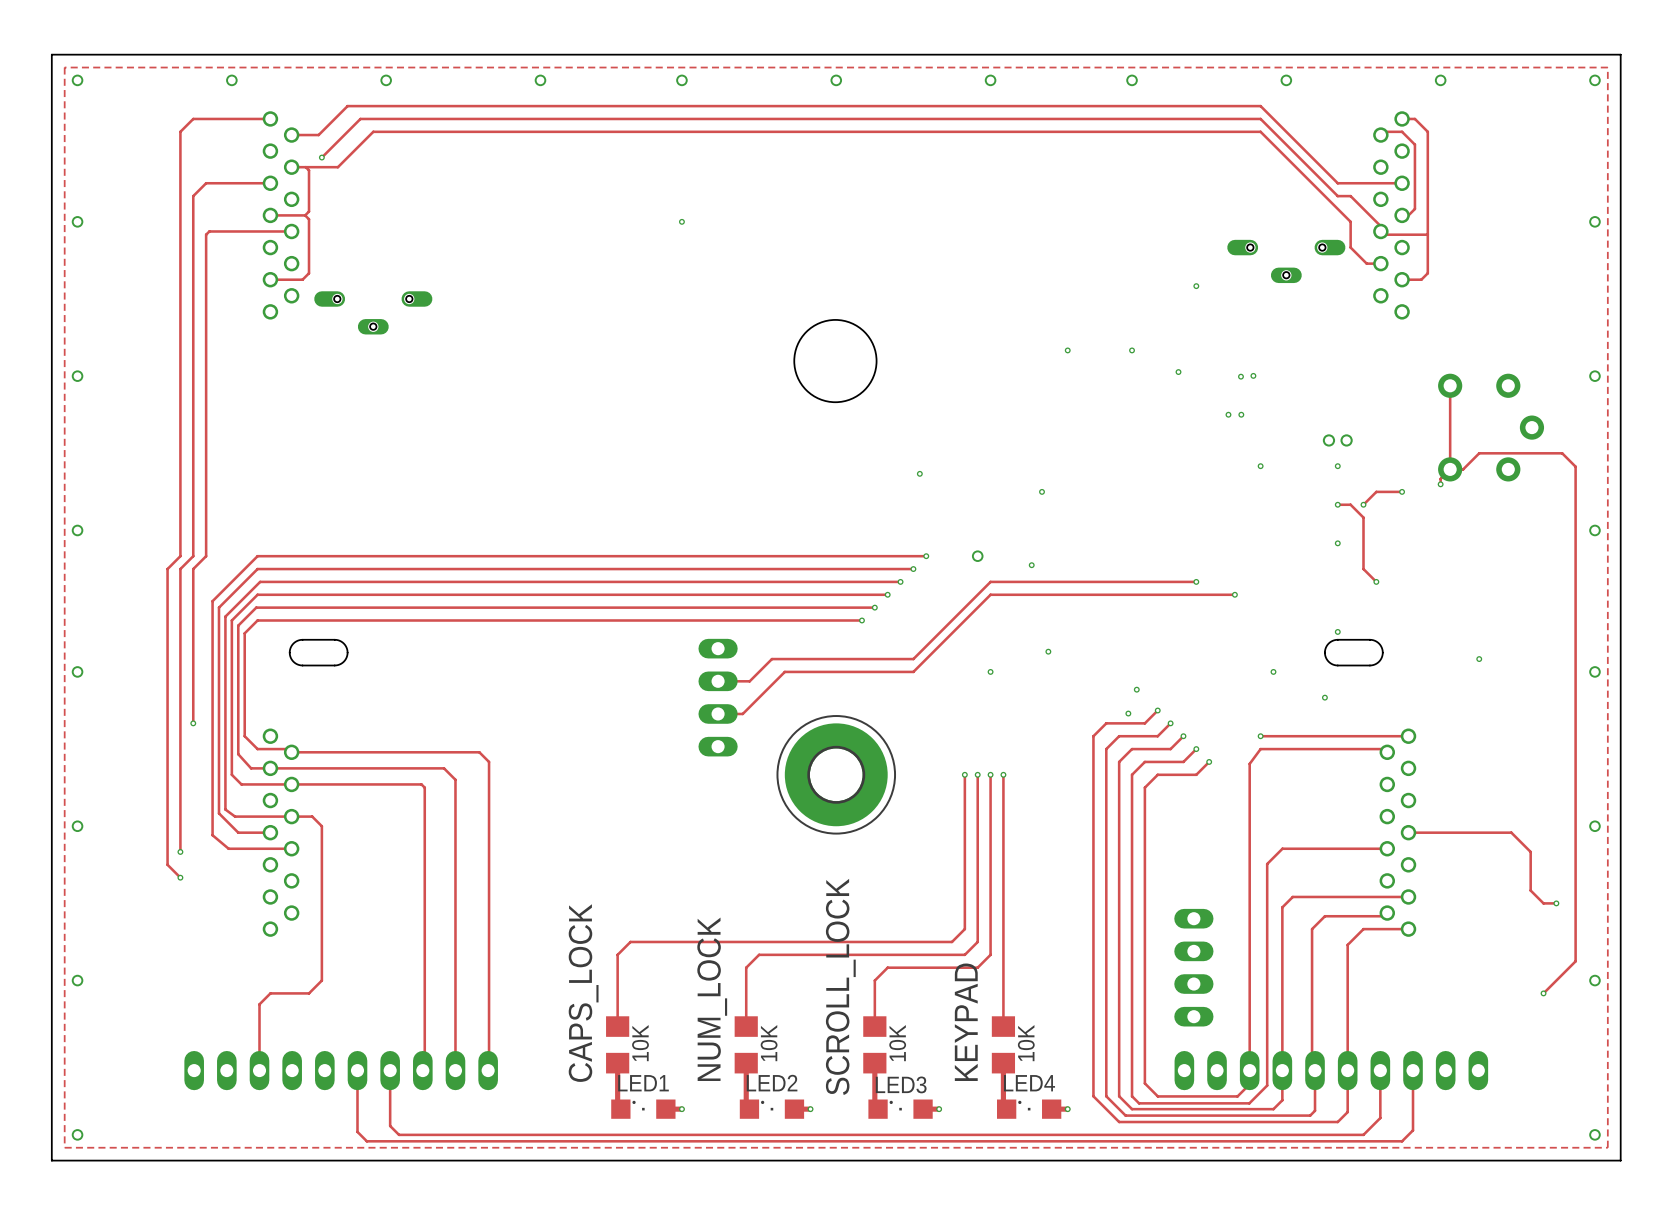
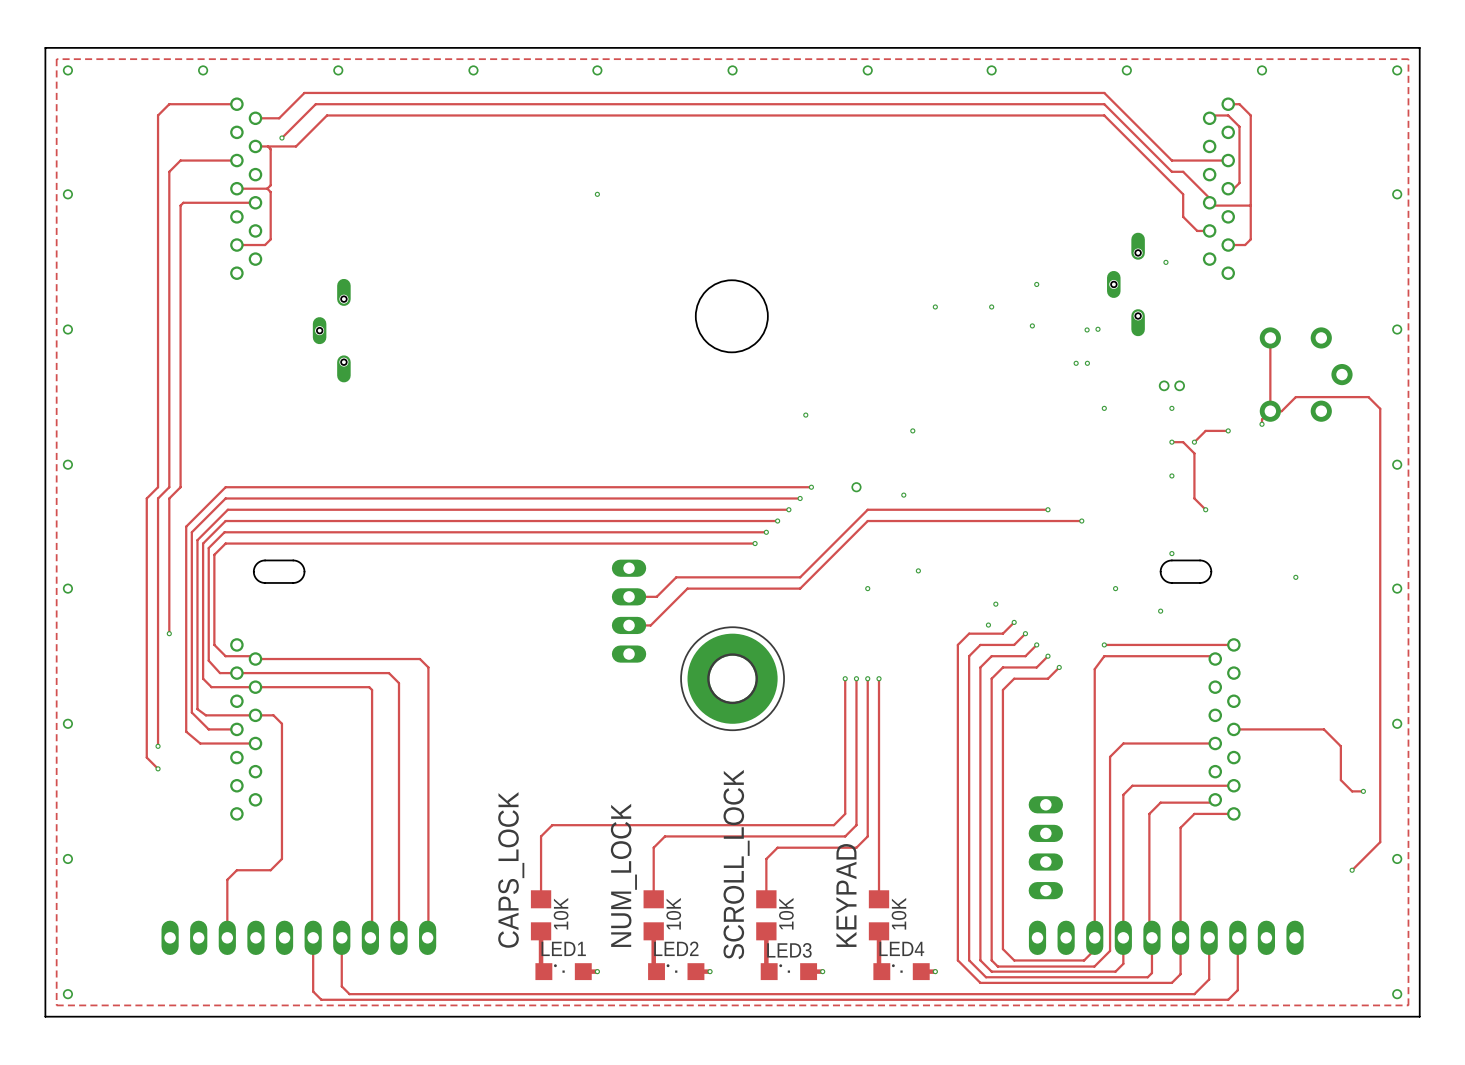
part rotation: 0° (1286, 261) -> 90° clockwise (1125, 284)
via position: (1196, 286) -> (1036, 284)
via: none -> (1165, 262)
part rotation: 0° (373, 312) -> 90° clockwise (331, 330)

